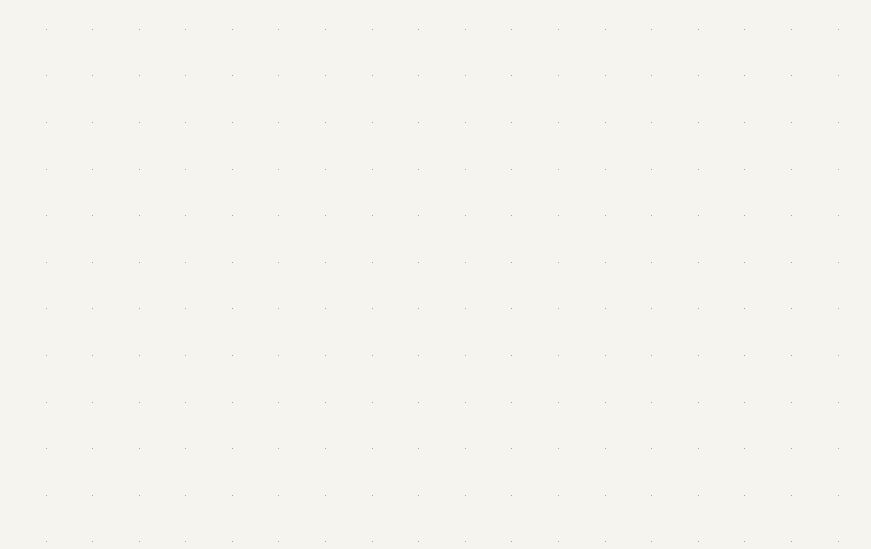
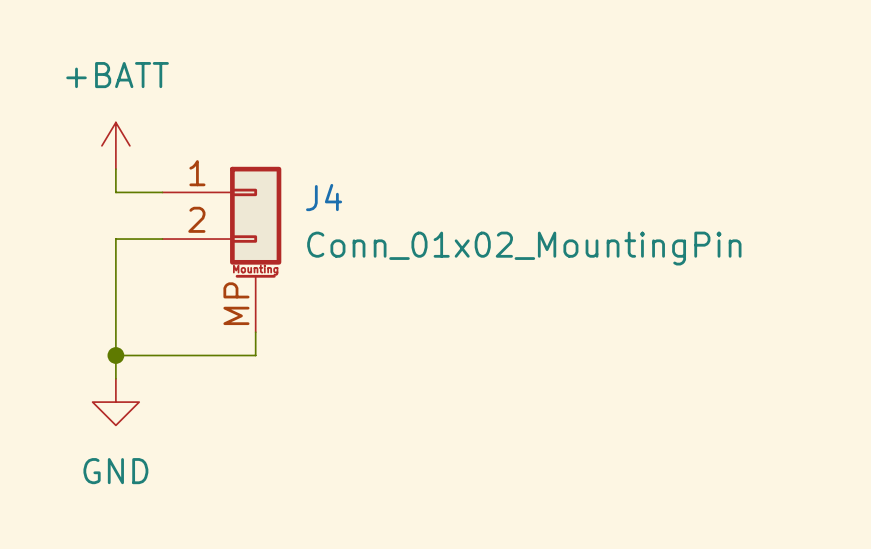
power symbol: none -> +BATT (115, 145)
wire: none -> (115, 169) (115, 192) (162, 192)
wire: none -> (162, 239) (115, 239) (115, 378)
J4: none -> Conn_01x02_MountingPin (221, 249)
wire: none -> (255, 332) (255, 355) (115, 355)
junction: none -> (115, 355)
power symbol: none -> GND (115, 402)

